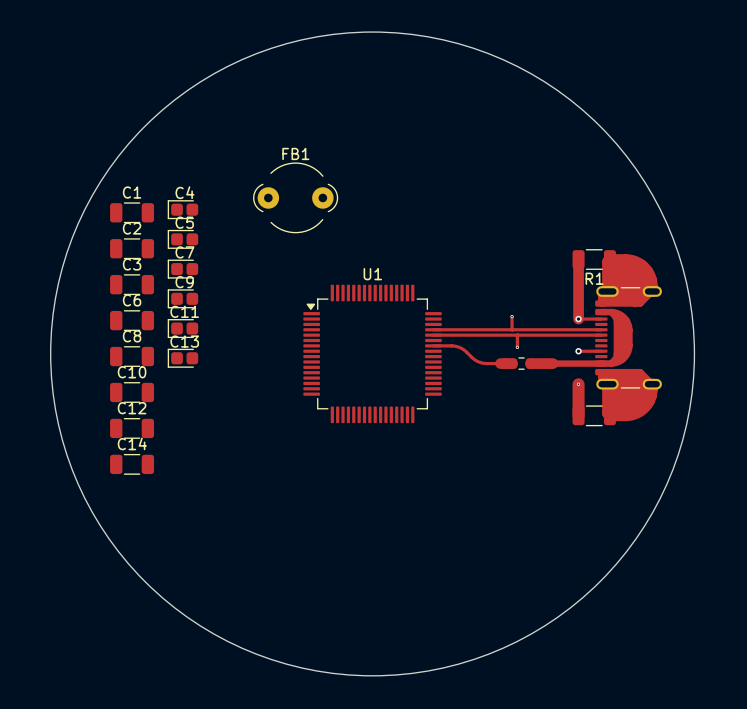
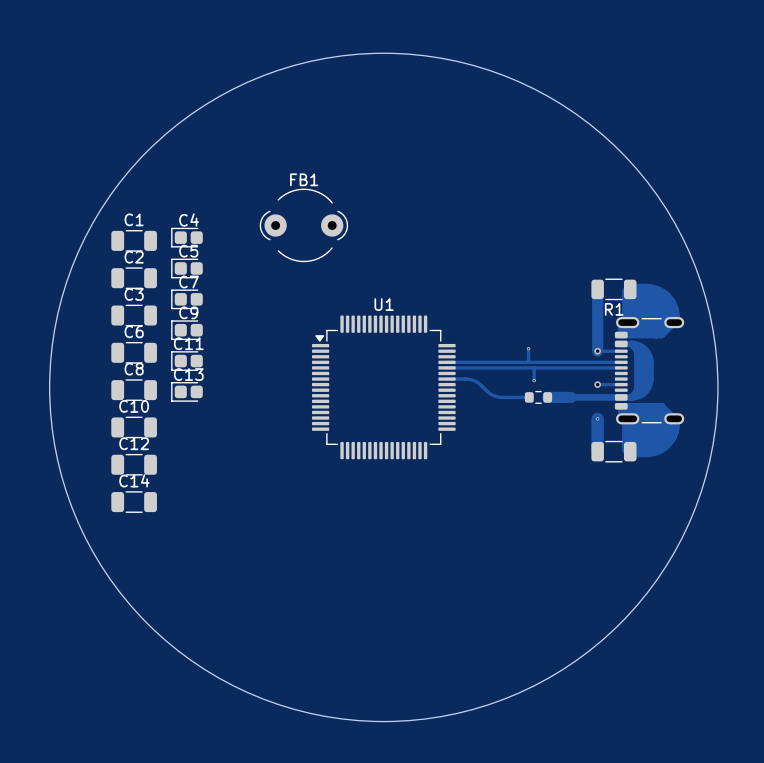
track width: thick (500, 363) (512, 363) -> thin (516, 397) (529, 397)

